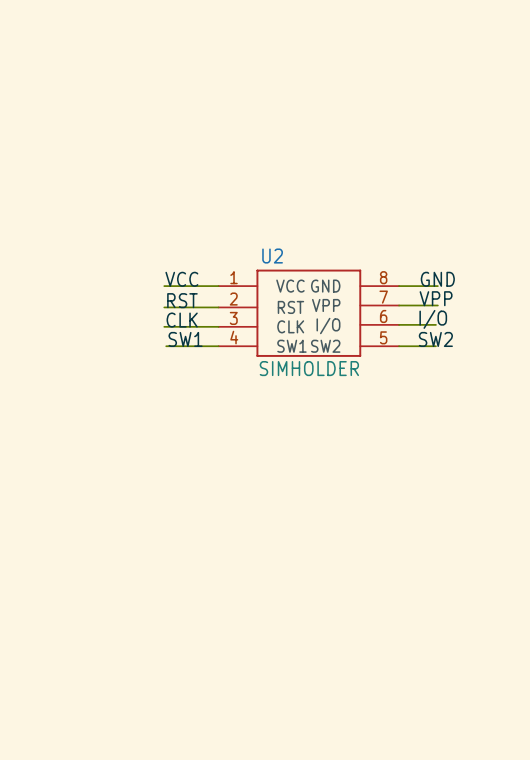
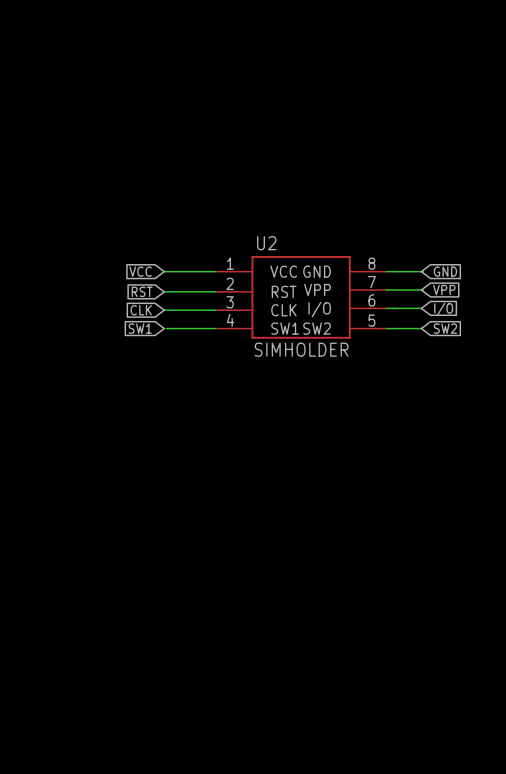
label: VCC (181, 279) -> none
label: GND (437, 279) -> none
global label: none -> VCC (140, 271)
global label: none -> GND (445, 271)
label: VPP (436, 298) -> none
label: RST (182, 300) -> none
global label: none -> VPP (444, 290)
global label: none -> RST (142, 291)
label: I/O (433, 319) -> none
label: CLK (182, 320) -> none
global label: none -> I/O (443, 309)
global label: none -> CLK (141, 310)
label: SW1 (185, 339) -> none
label: SW2 (435, 339) -> none
global label: none -> SW1 (140, 328)
global label: none -> SW2 (445, 328)

